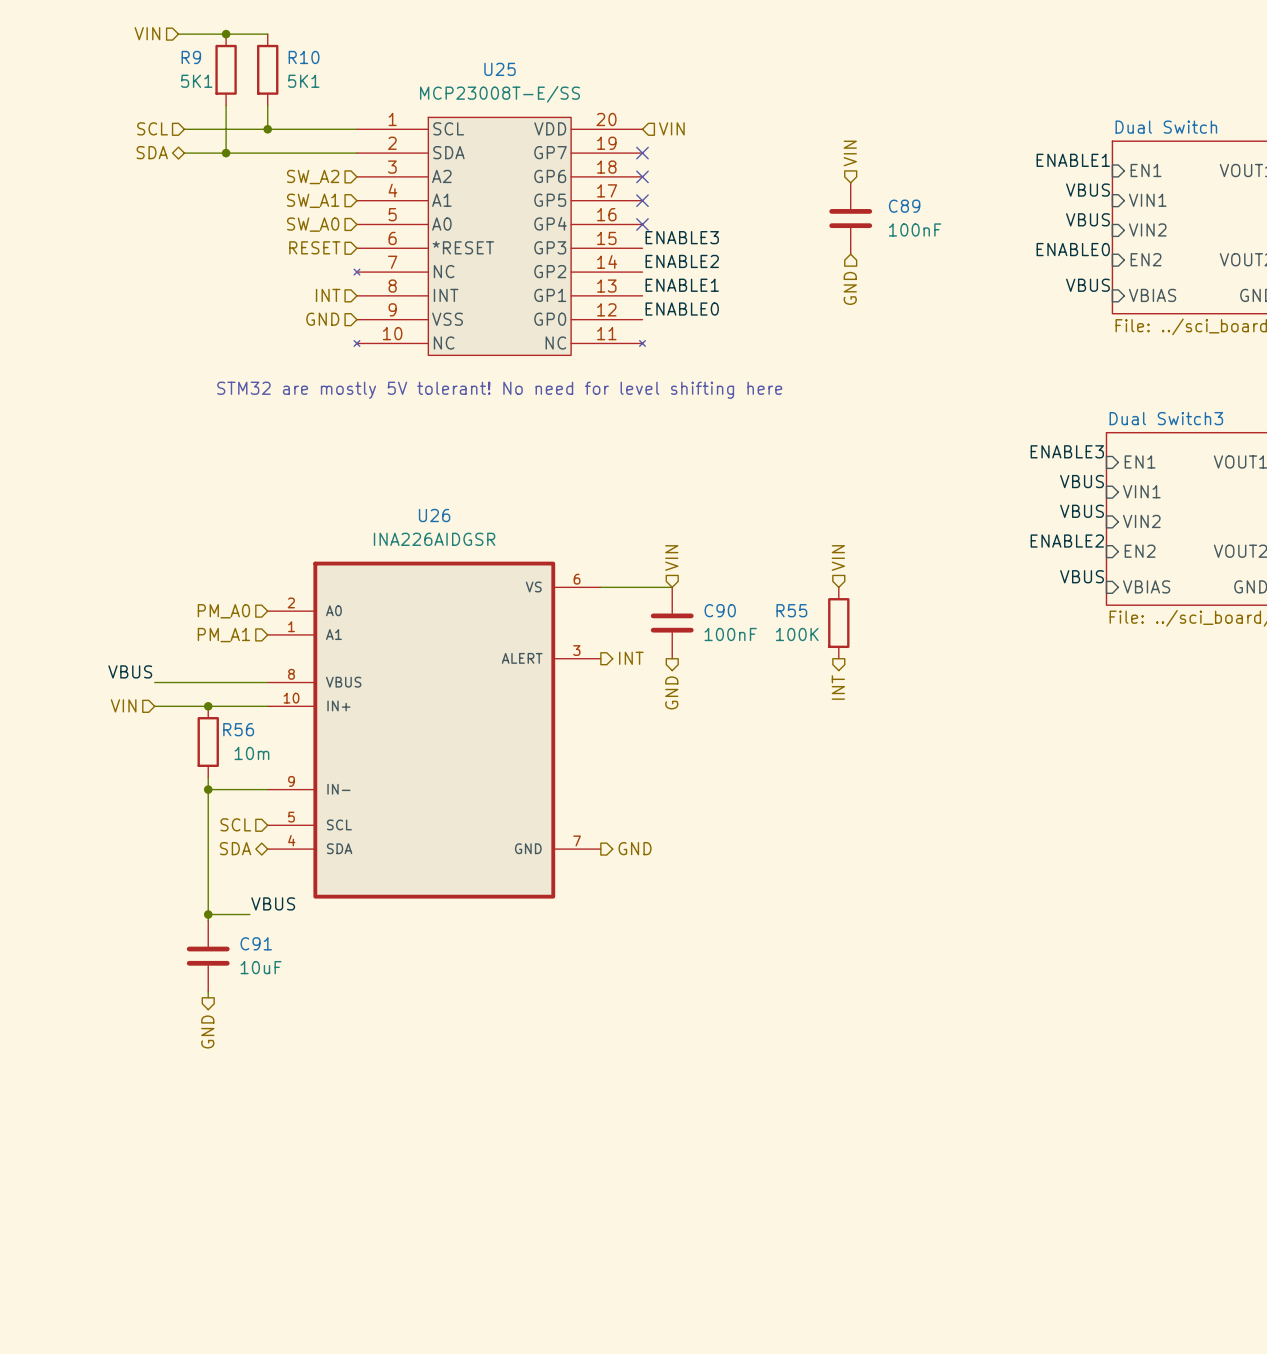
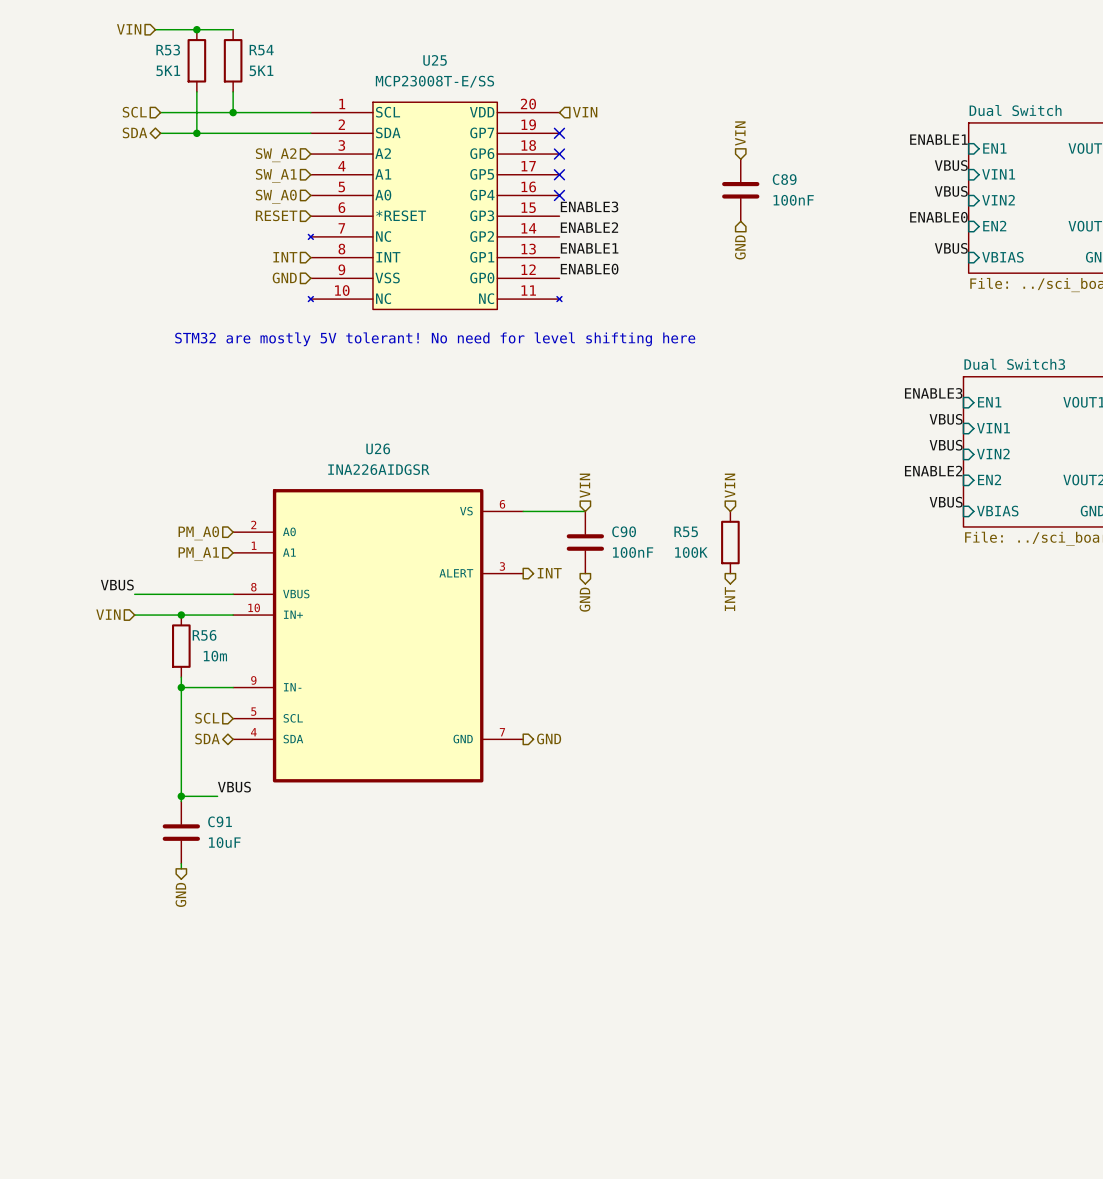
R9 name: R9 (191, 57) -> R53 (168, 50)
R10 name: R10 (304, 57) -> R54 (261, 50)

